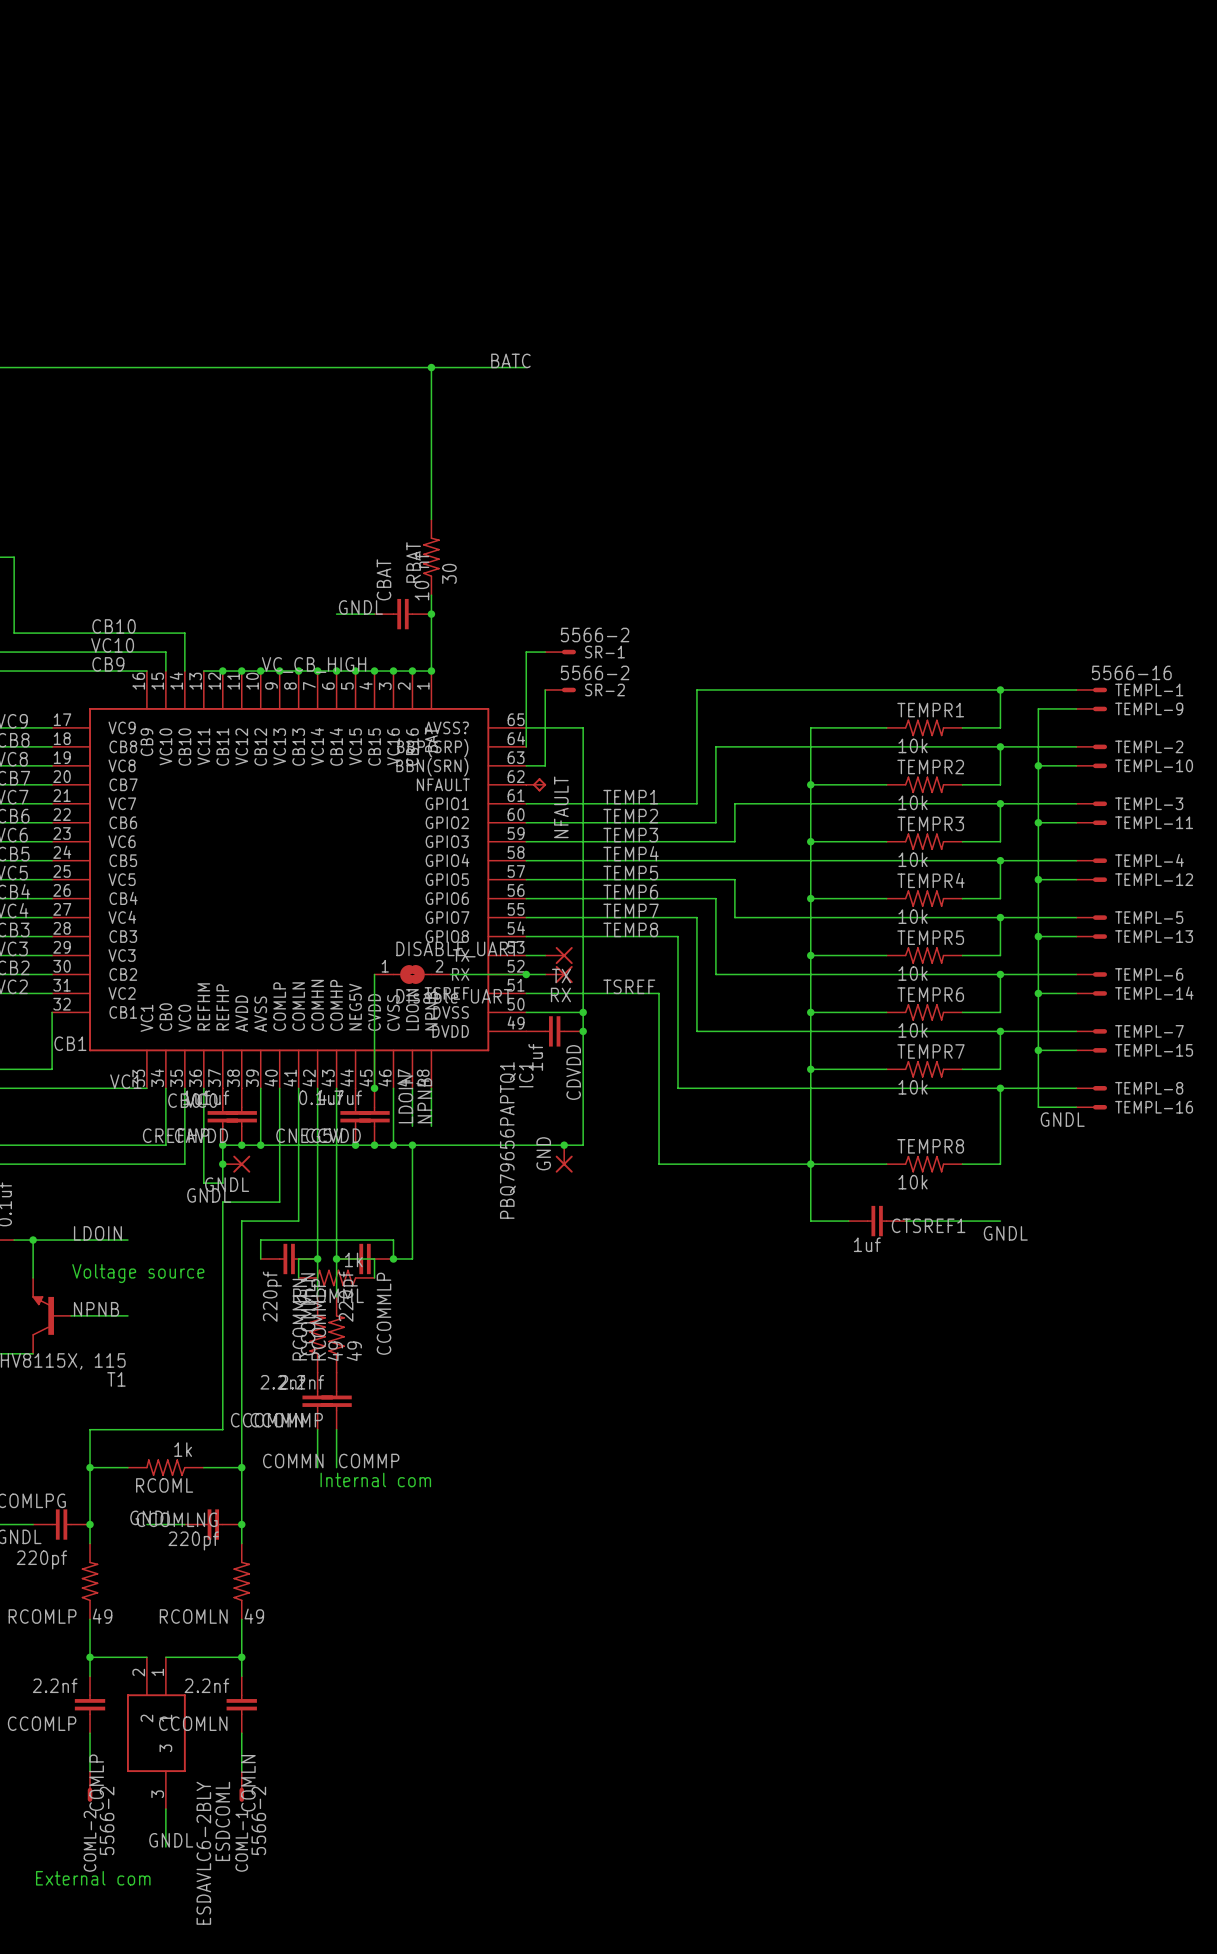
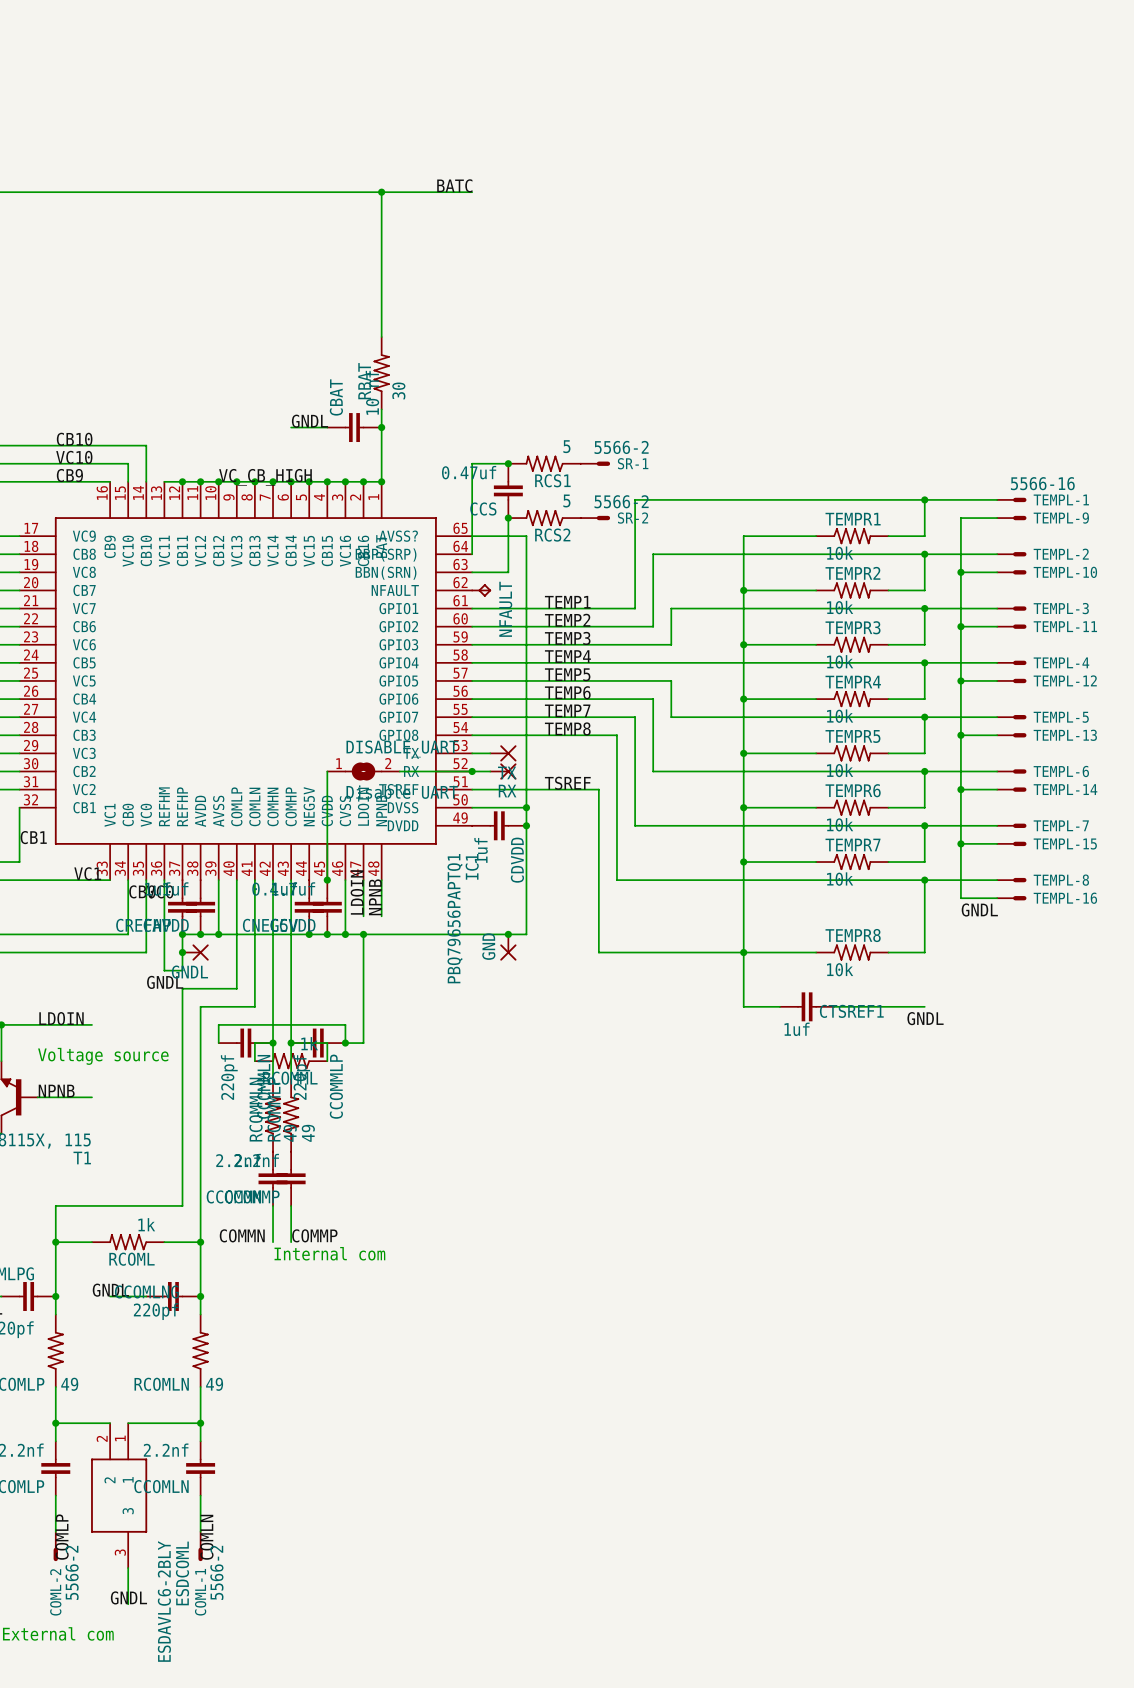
SR-1 position: (560, 652) -> (595, 463)
junction: none -> (508, 463)
RCS1: none -> 5 (544, 463)
CCS: none -> 0.47uf (508, 490)
wire: (545, 689) (545, 765) -> (508, 518) (508, 572) (490, 572)
SR-2 position: (560, 689) -> (595, 518)
junction: none -> (508, 518)
RCS2: none -> 5 (544, 518)

